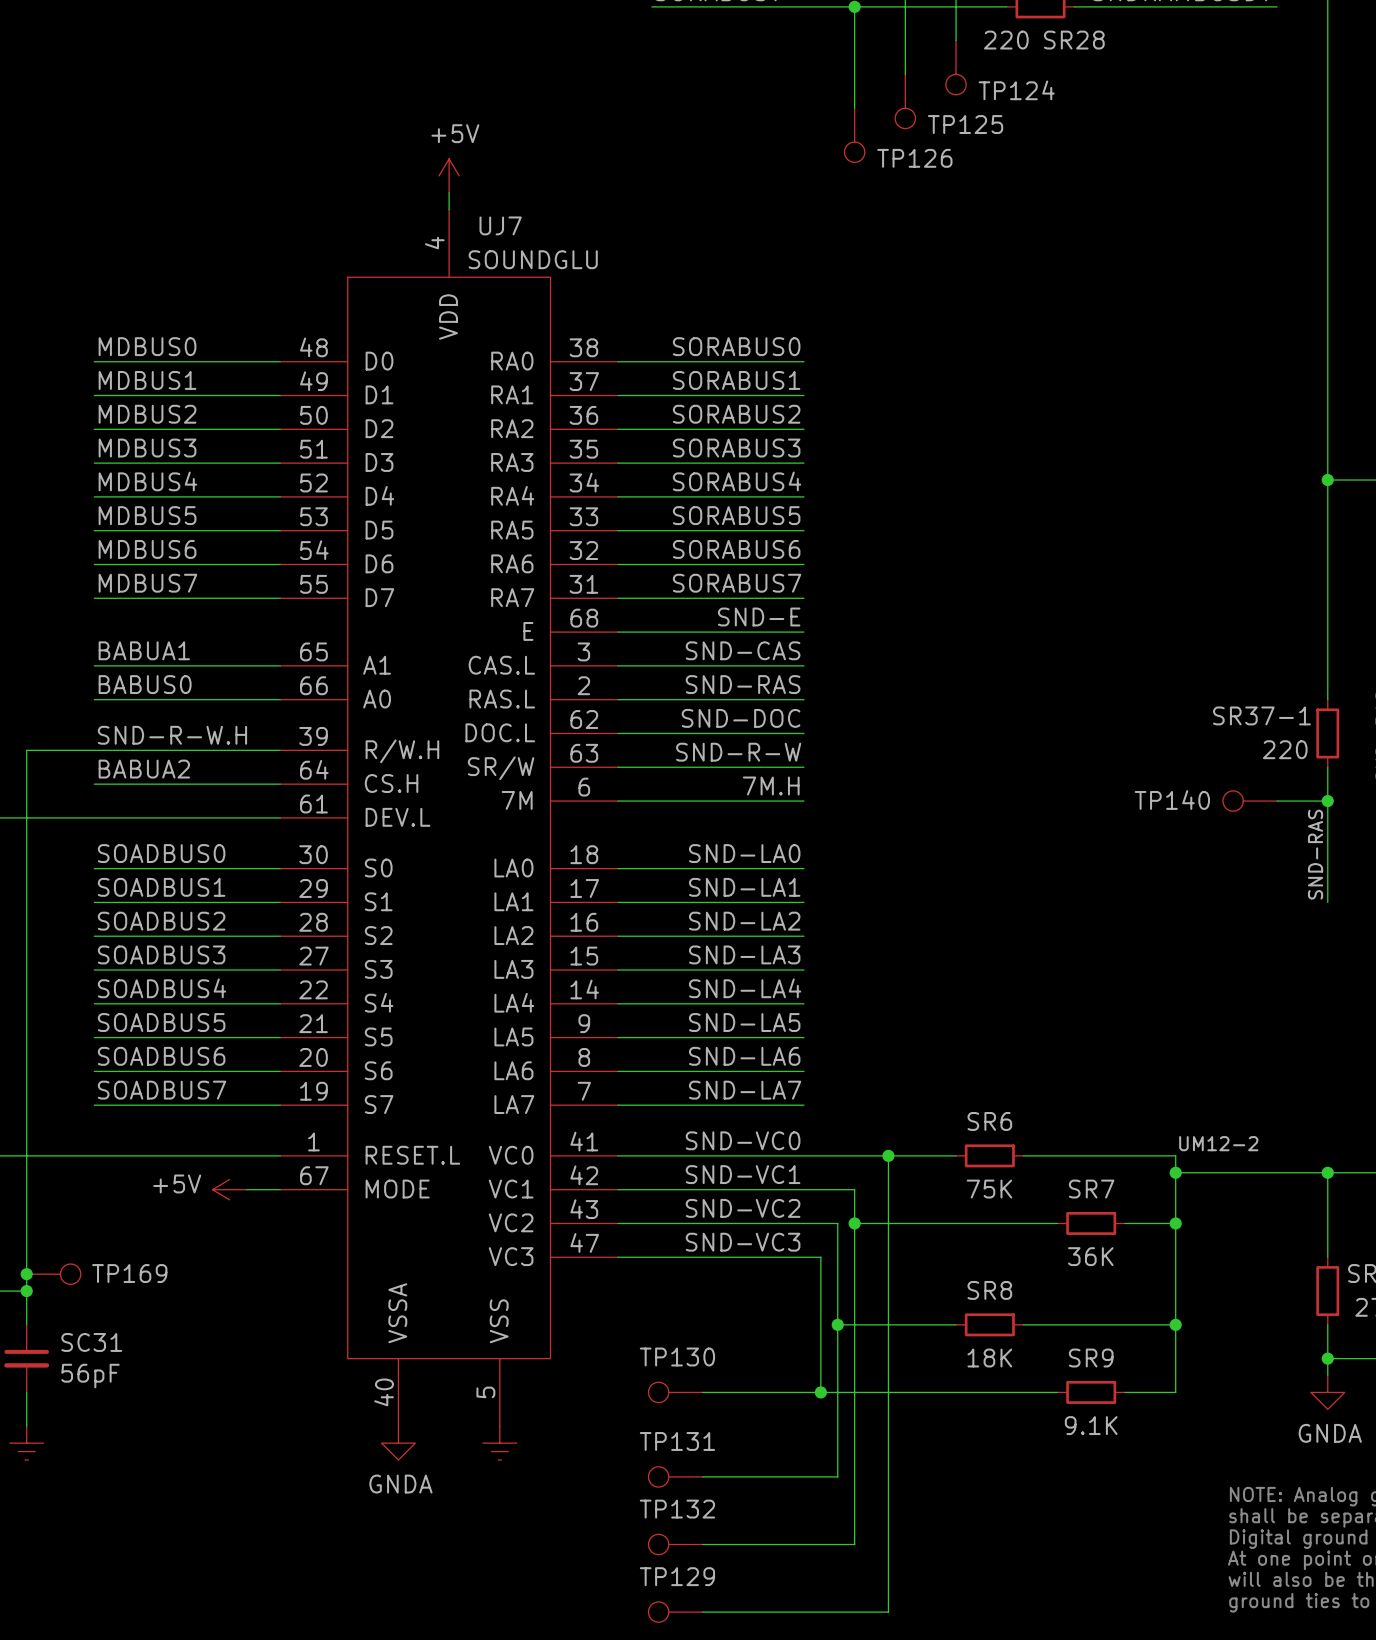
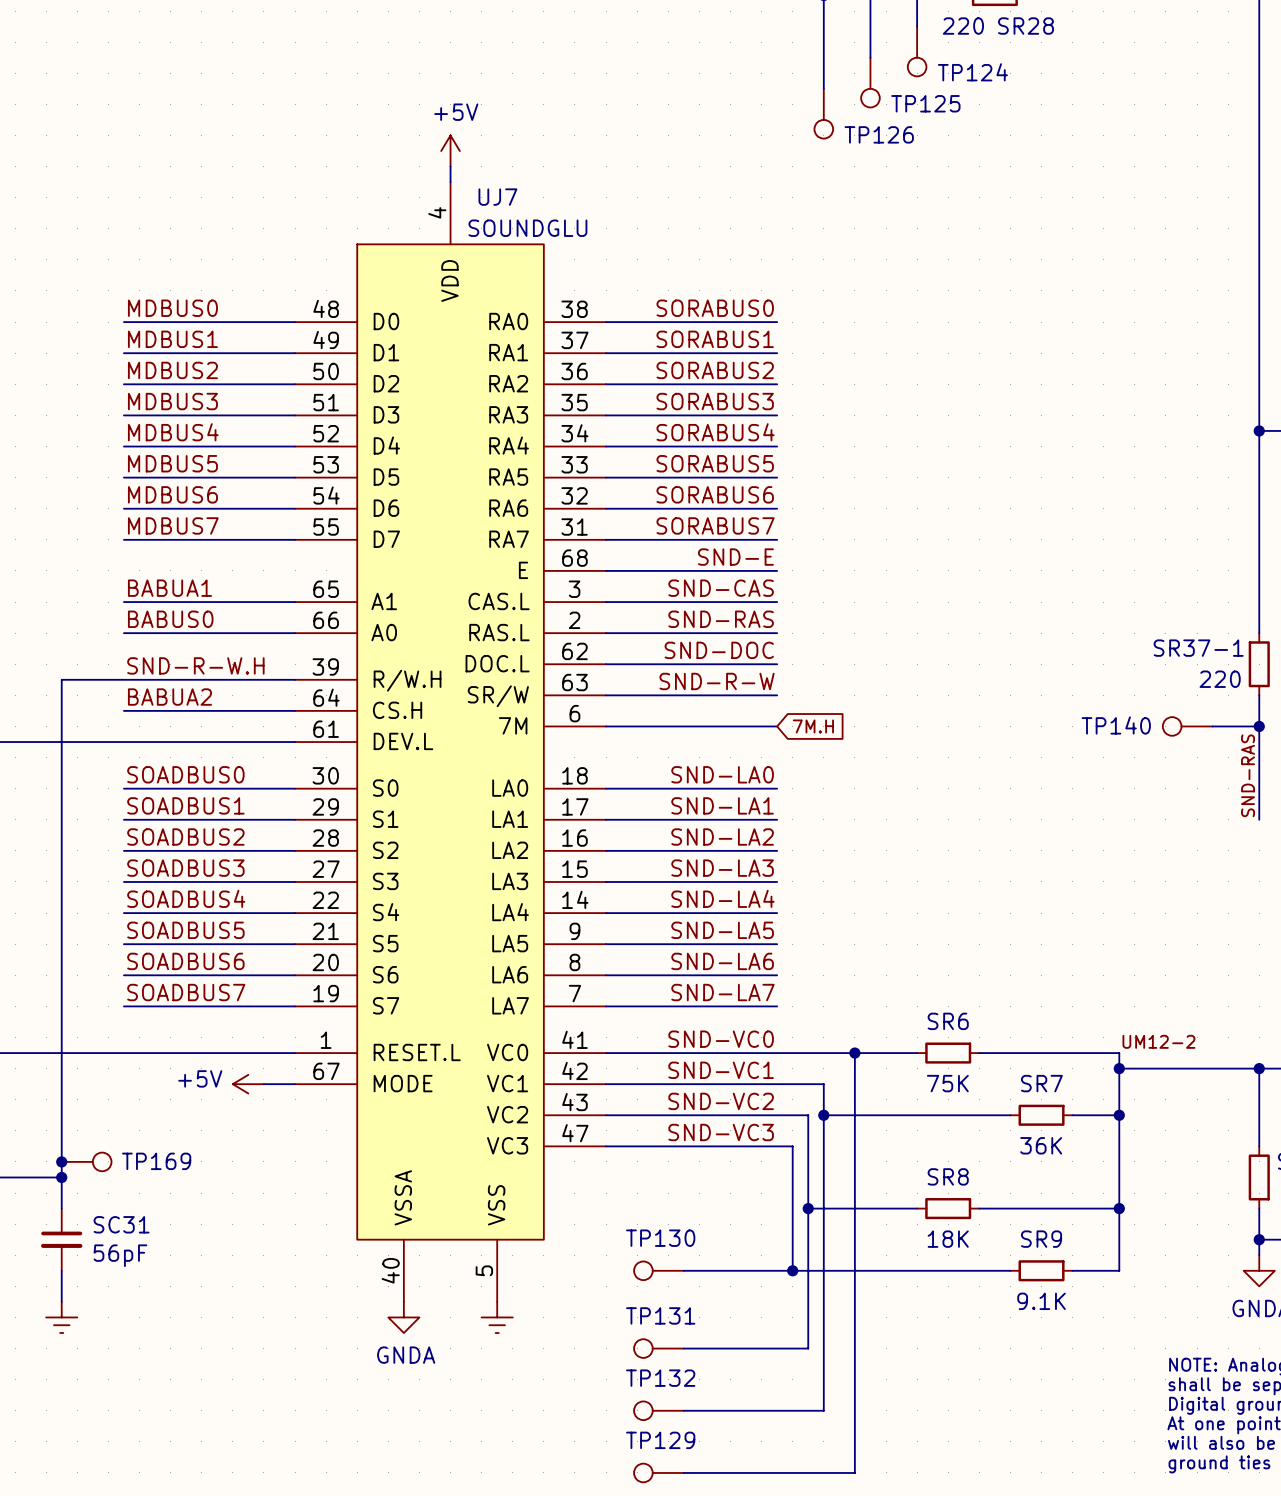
label: 7M.H (771, 785) -> none
global label: none -> 7M.H (813, 726)

